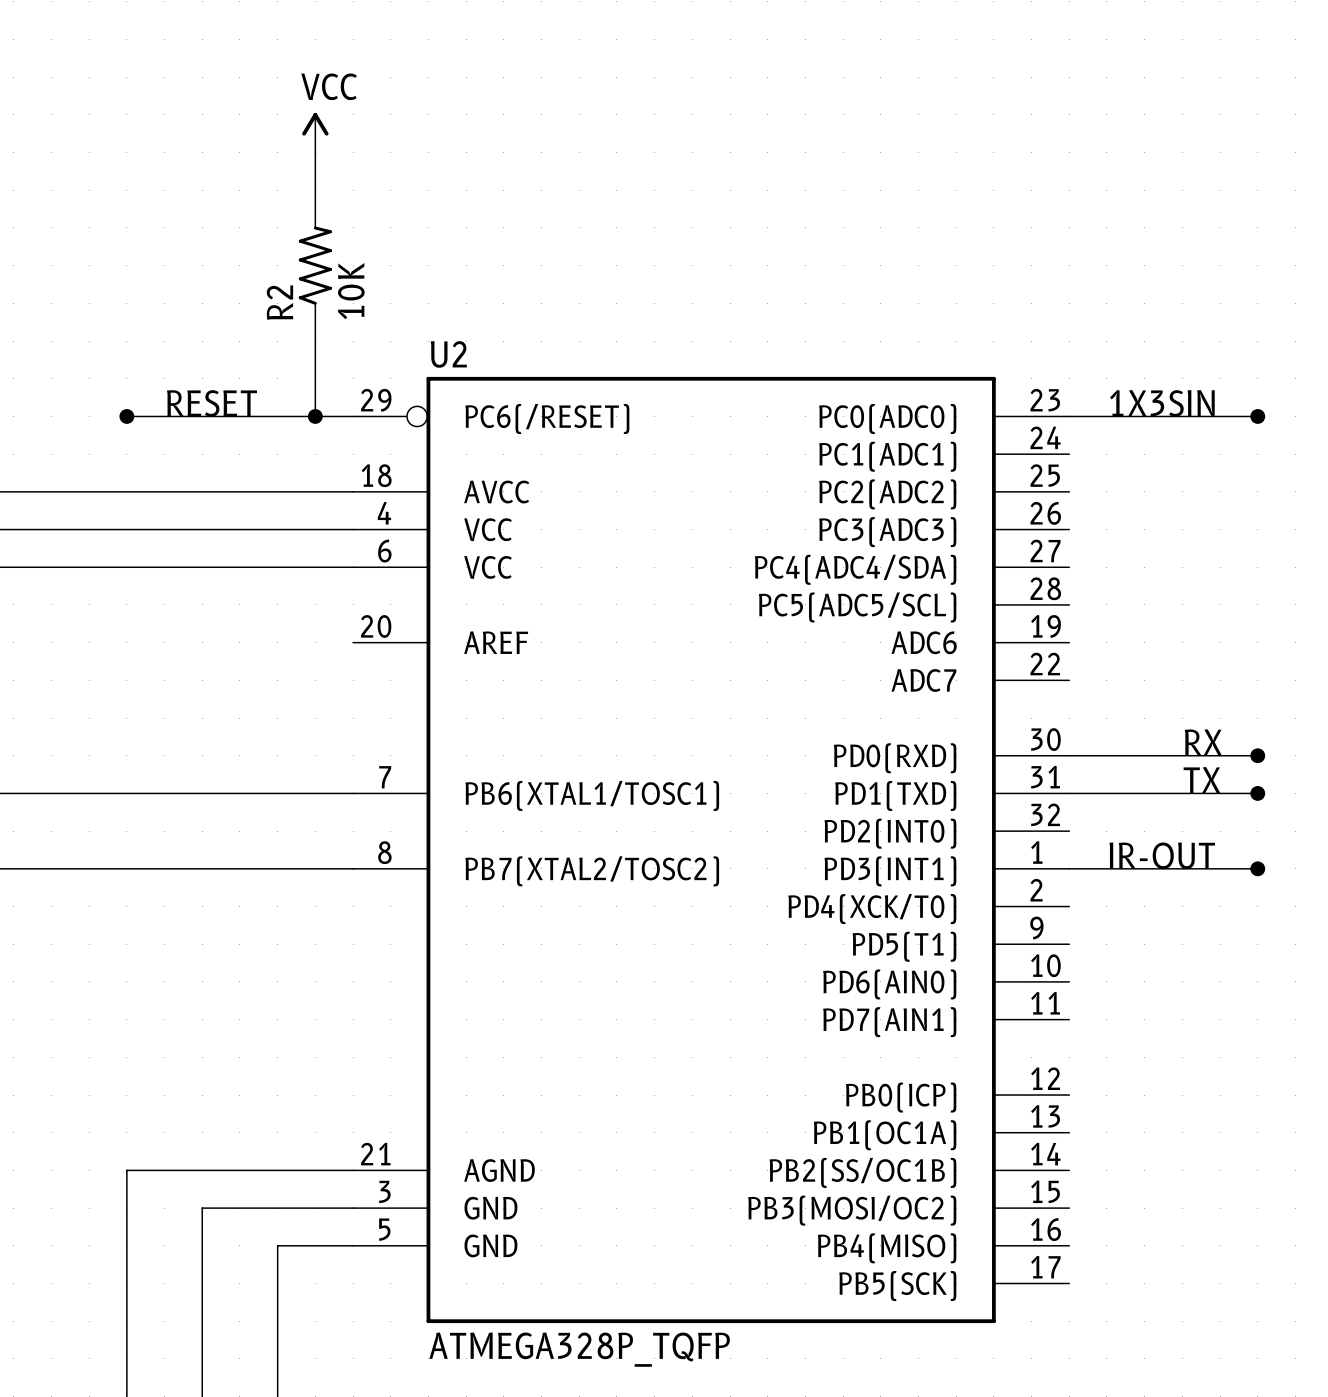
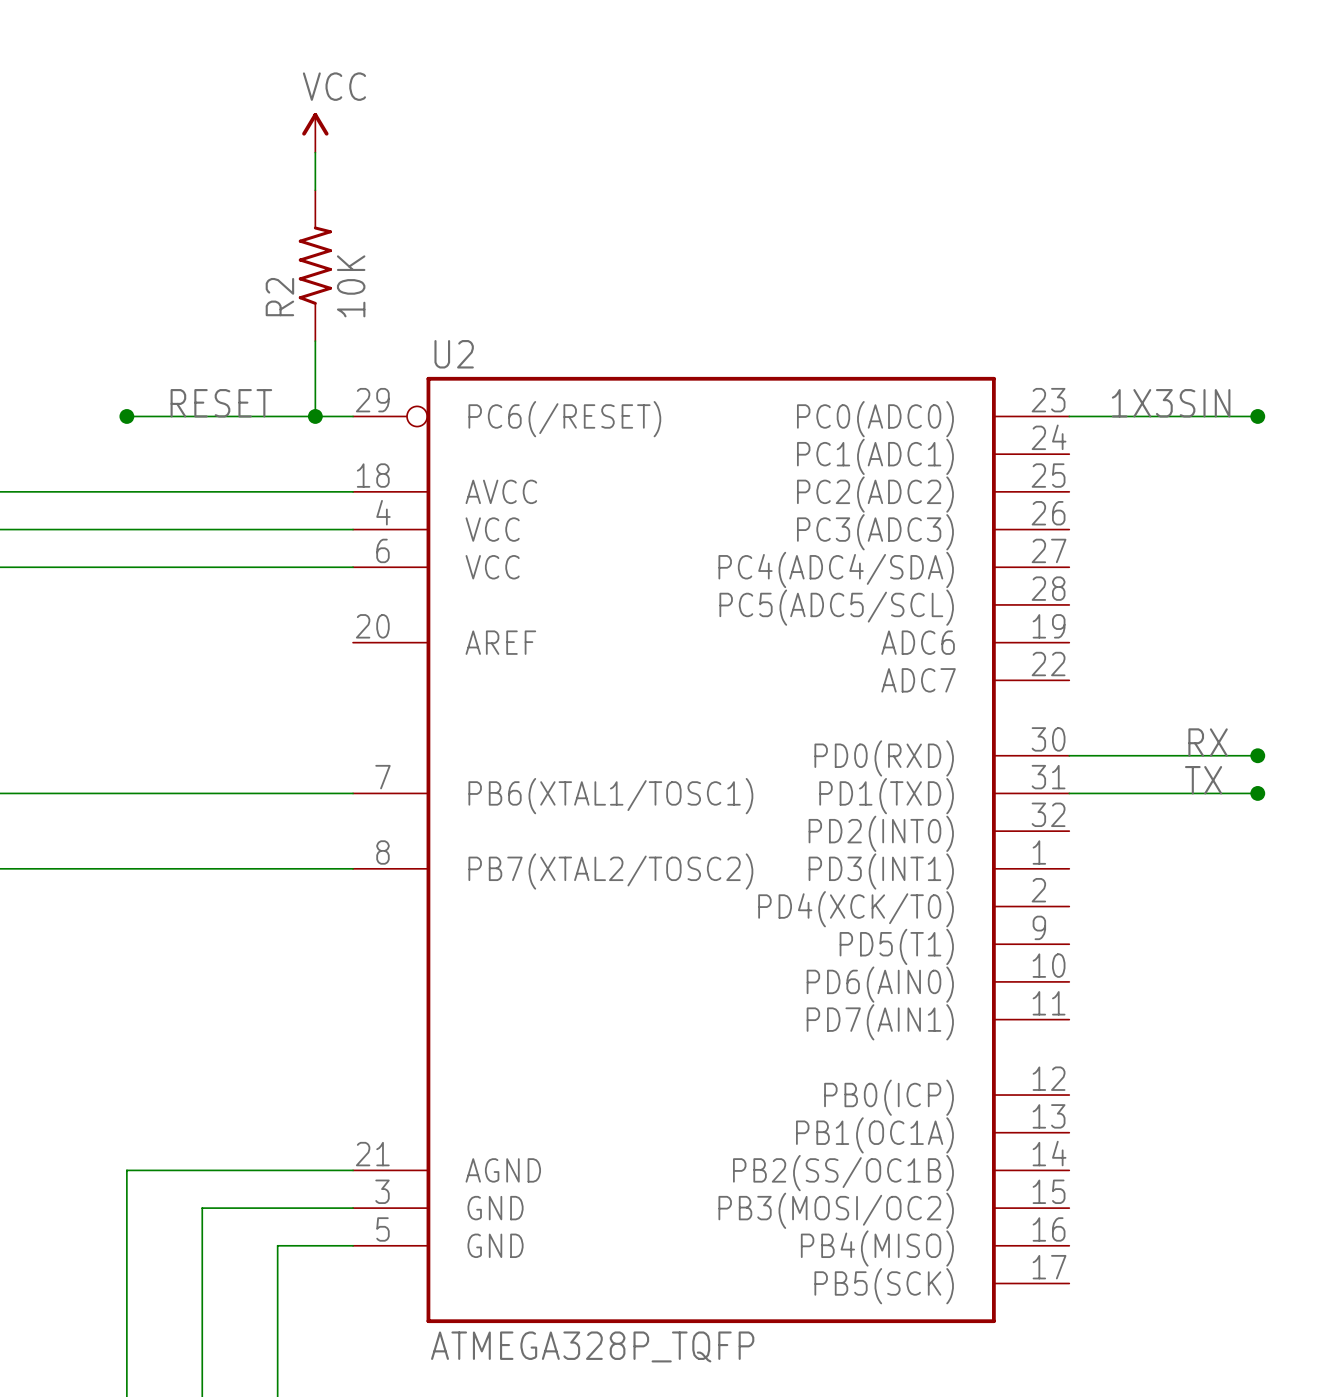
label: IR-OUT (1162, 855) -> none
wire: (1069, 868) (1257, 868) -> none
junction: (1257, 868) -> none

